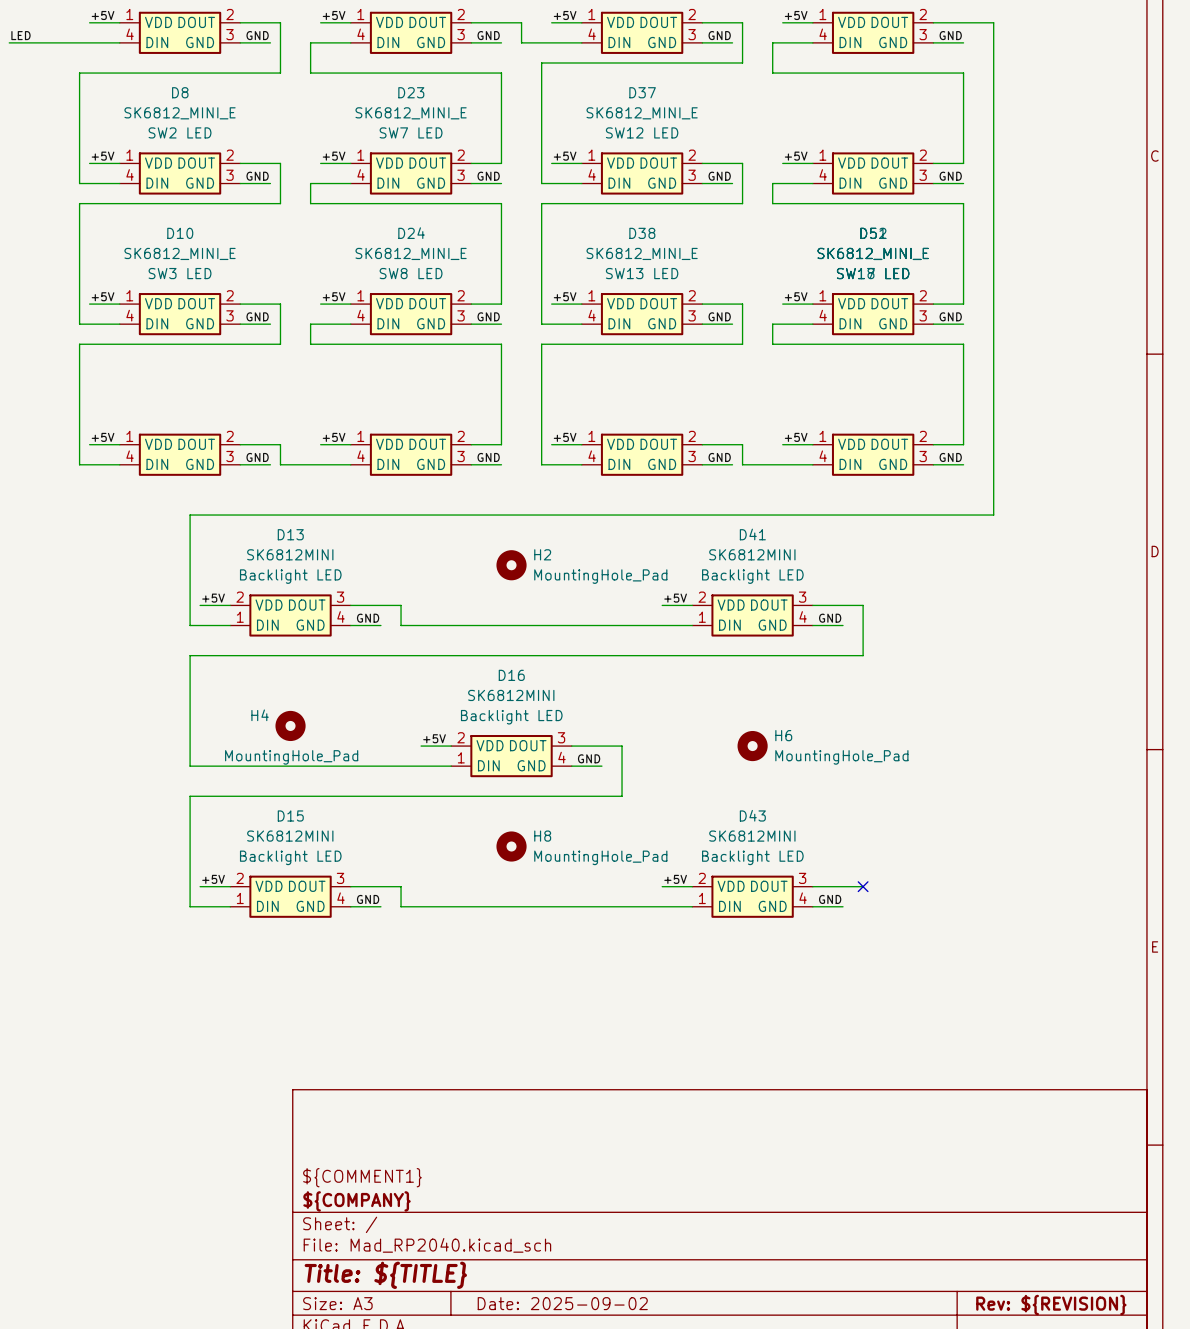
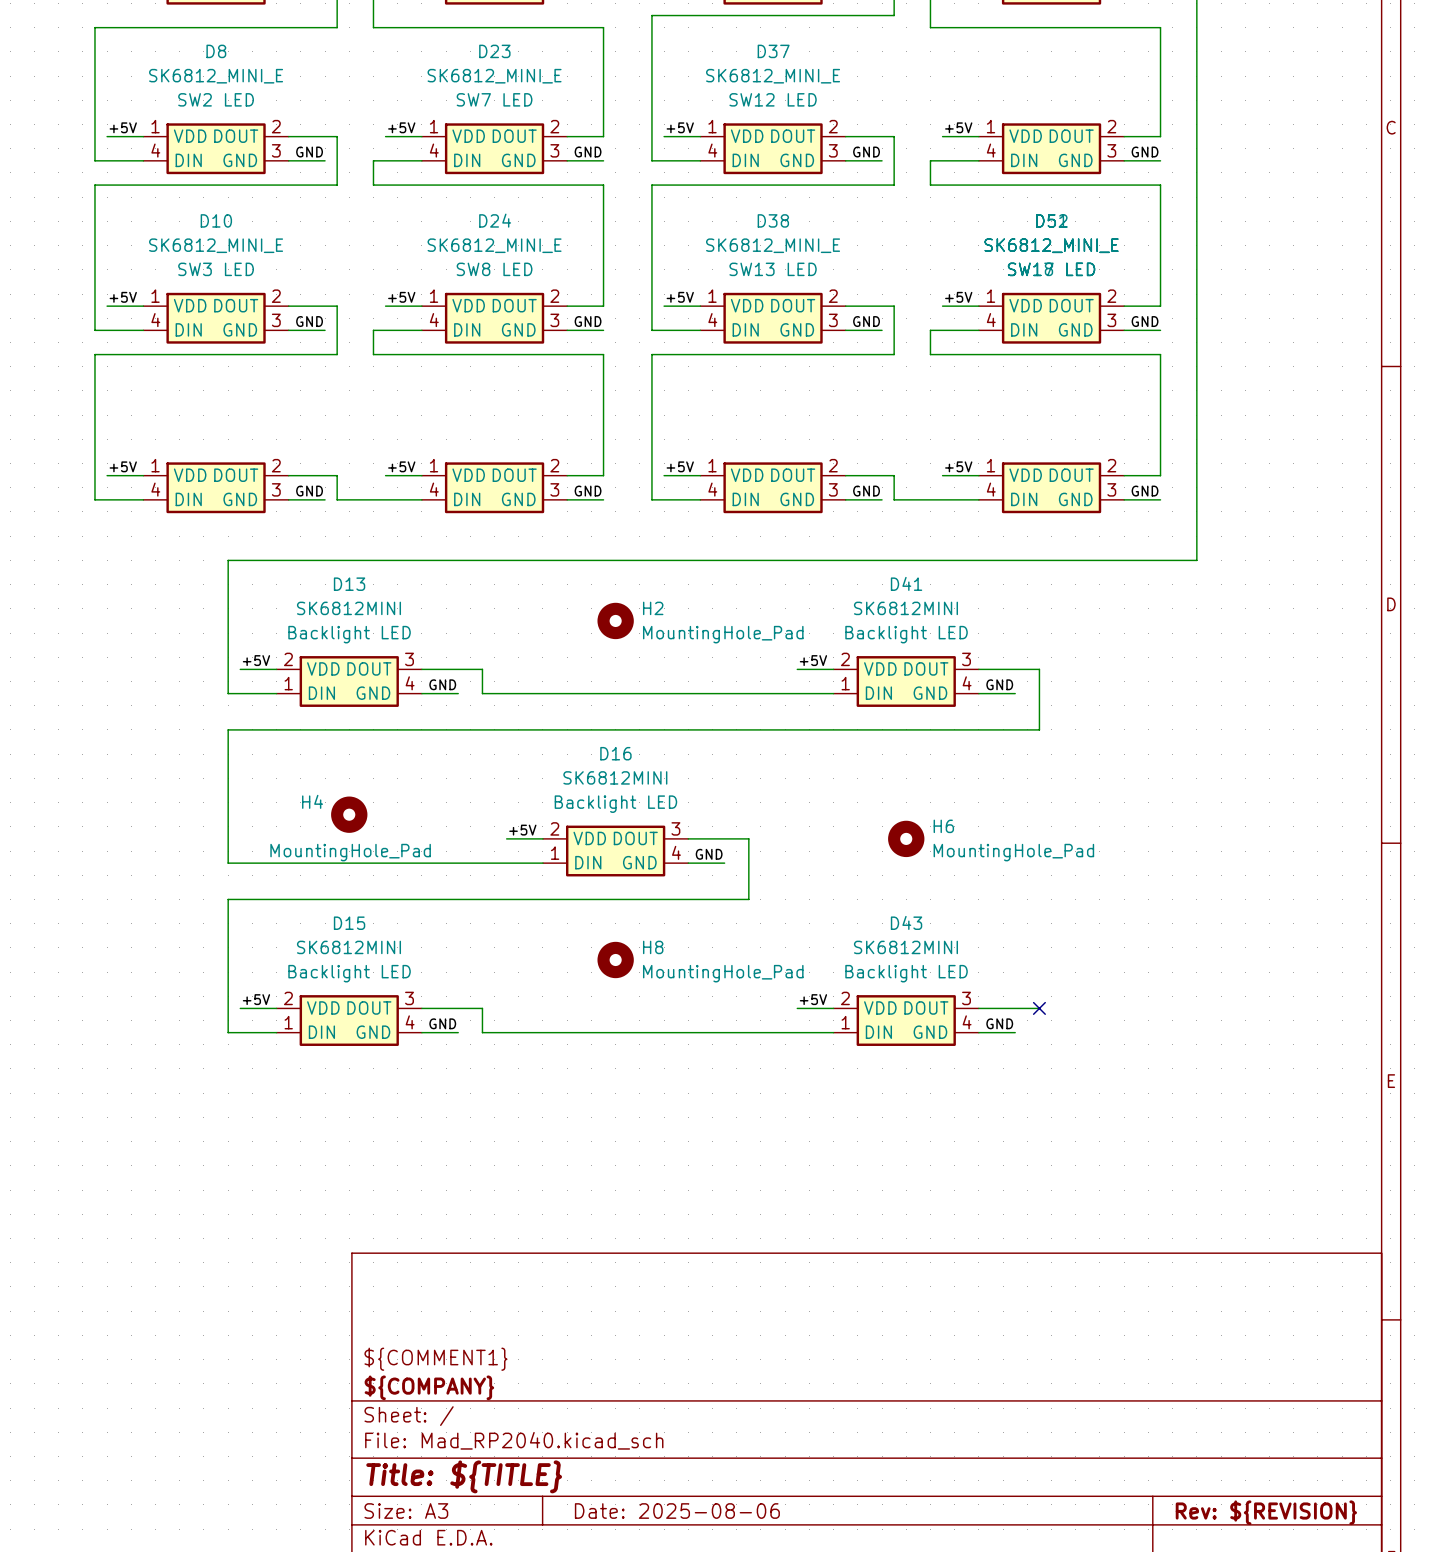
title block: Date: 2025-09-02 (562, 1303) -> Date: 2025-08-06 (677, 1511)

